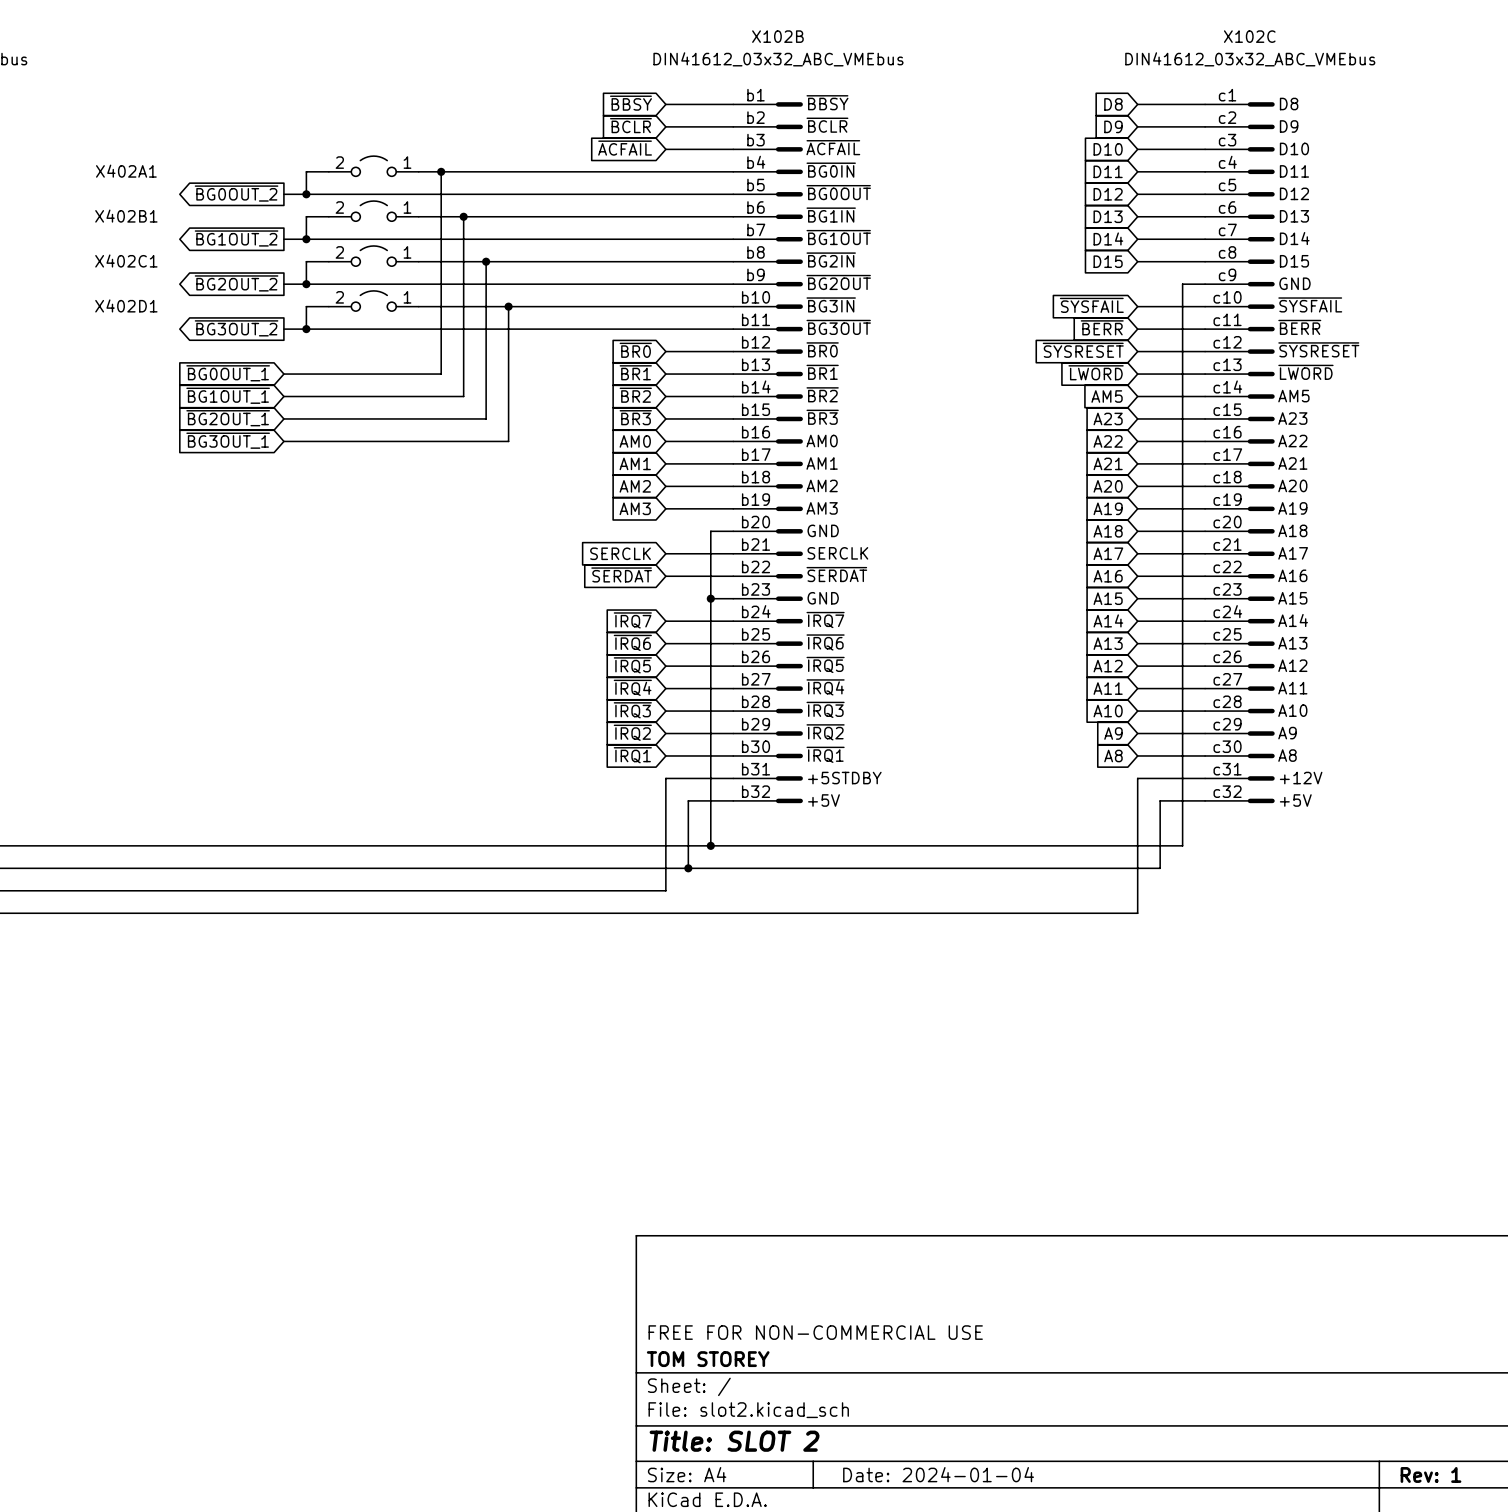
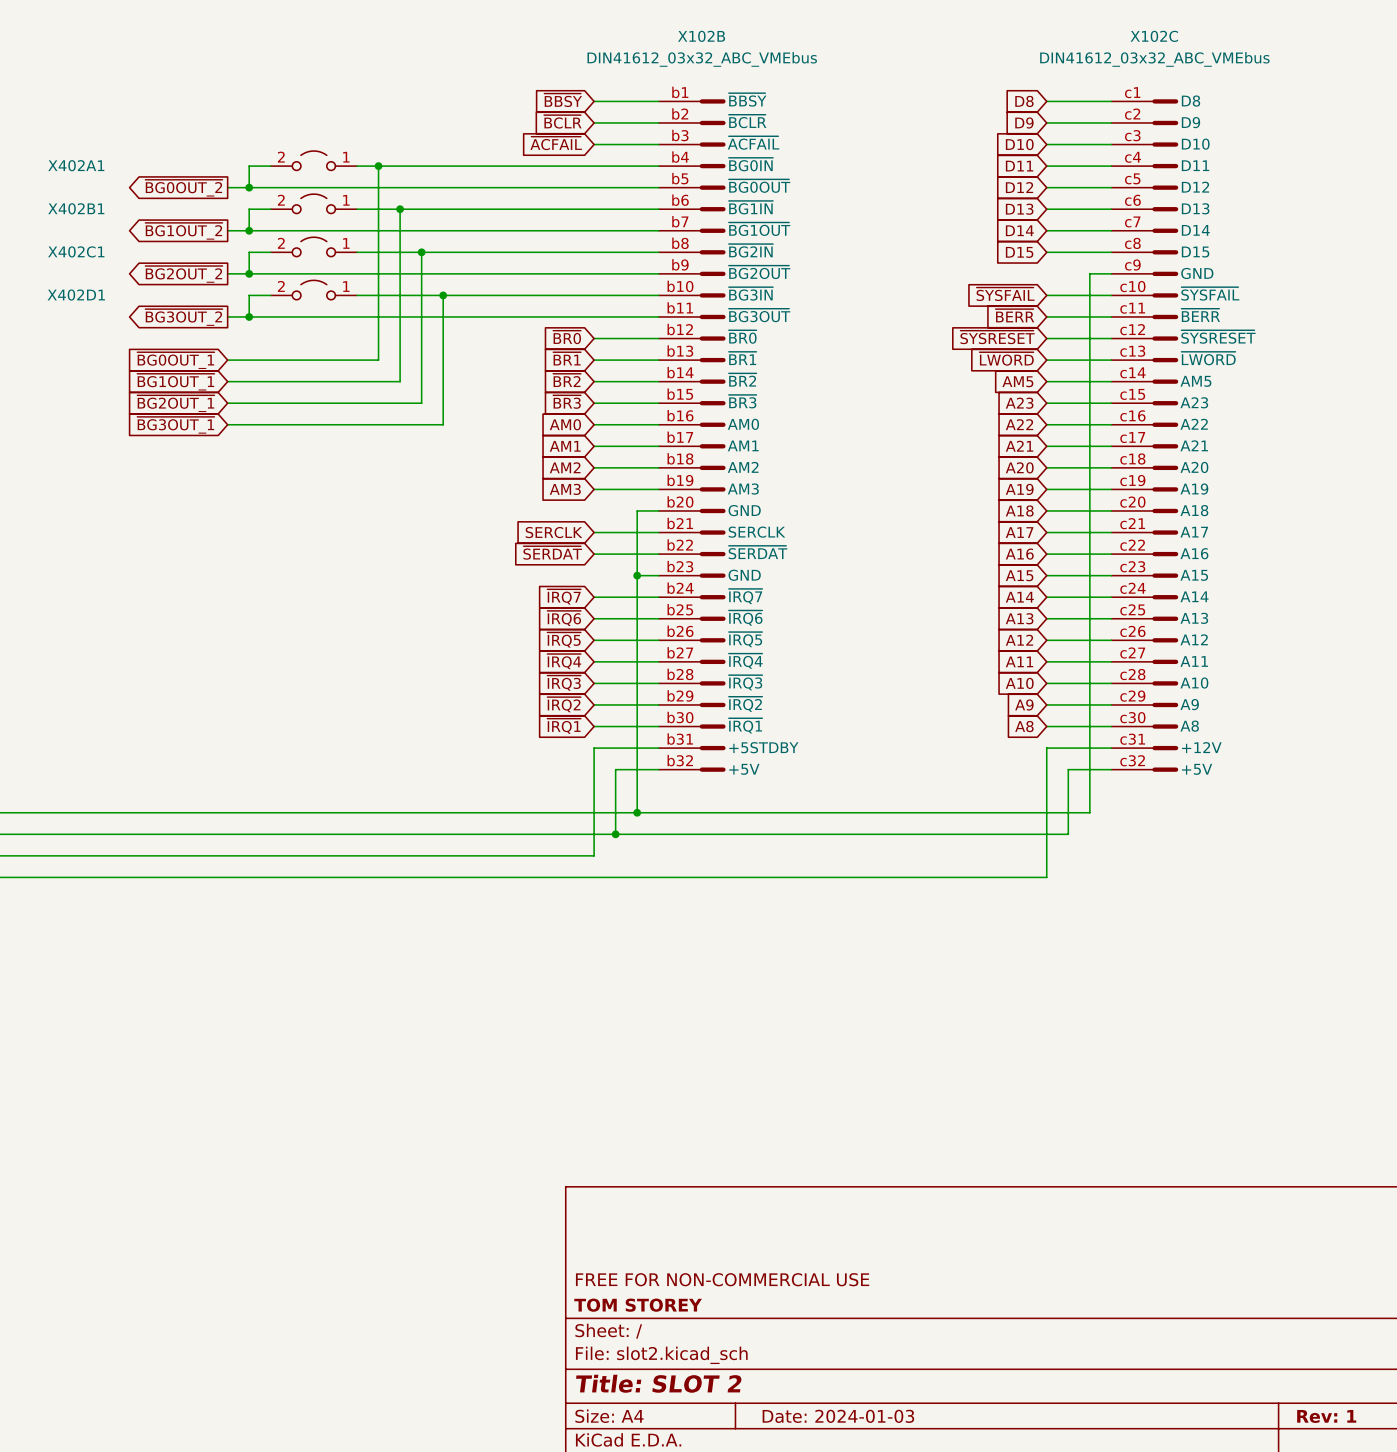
title block: Date: 2024-01-04 (938, 1474) -> Date: 2024-01-03 (838, 1416)

